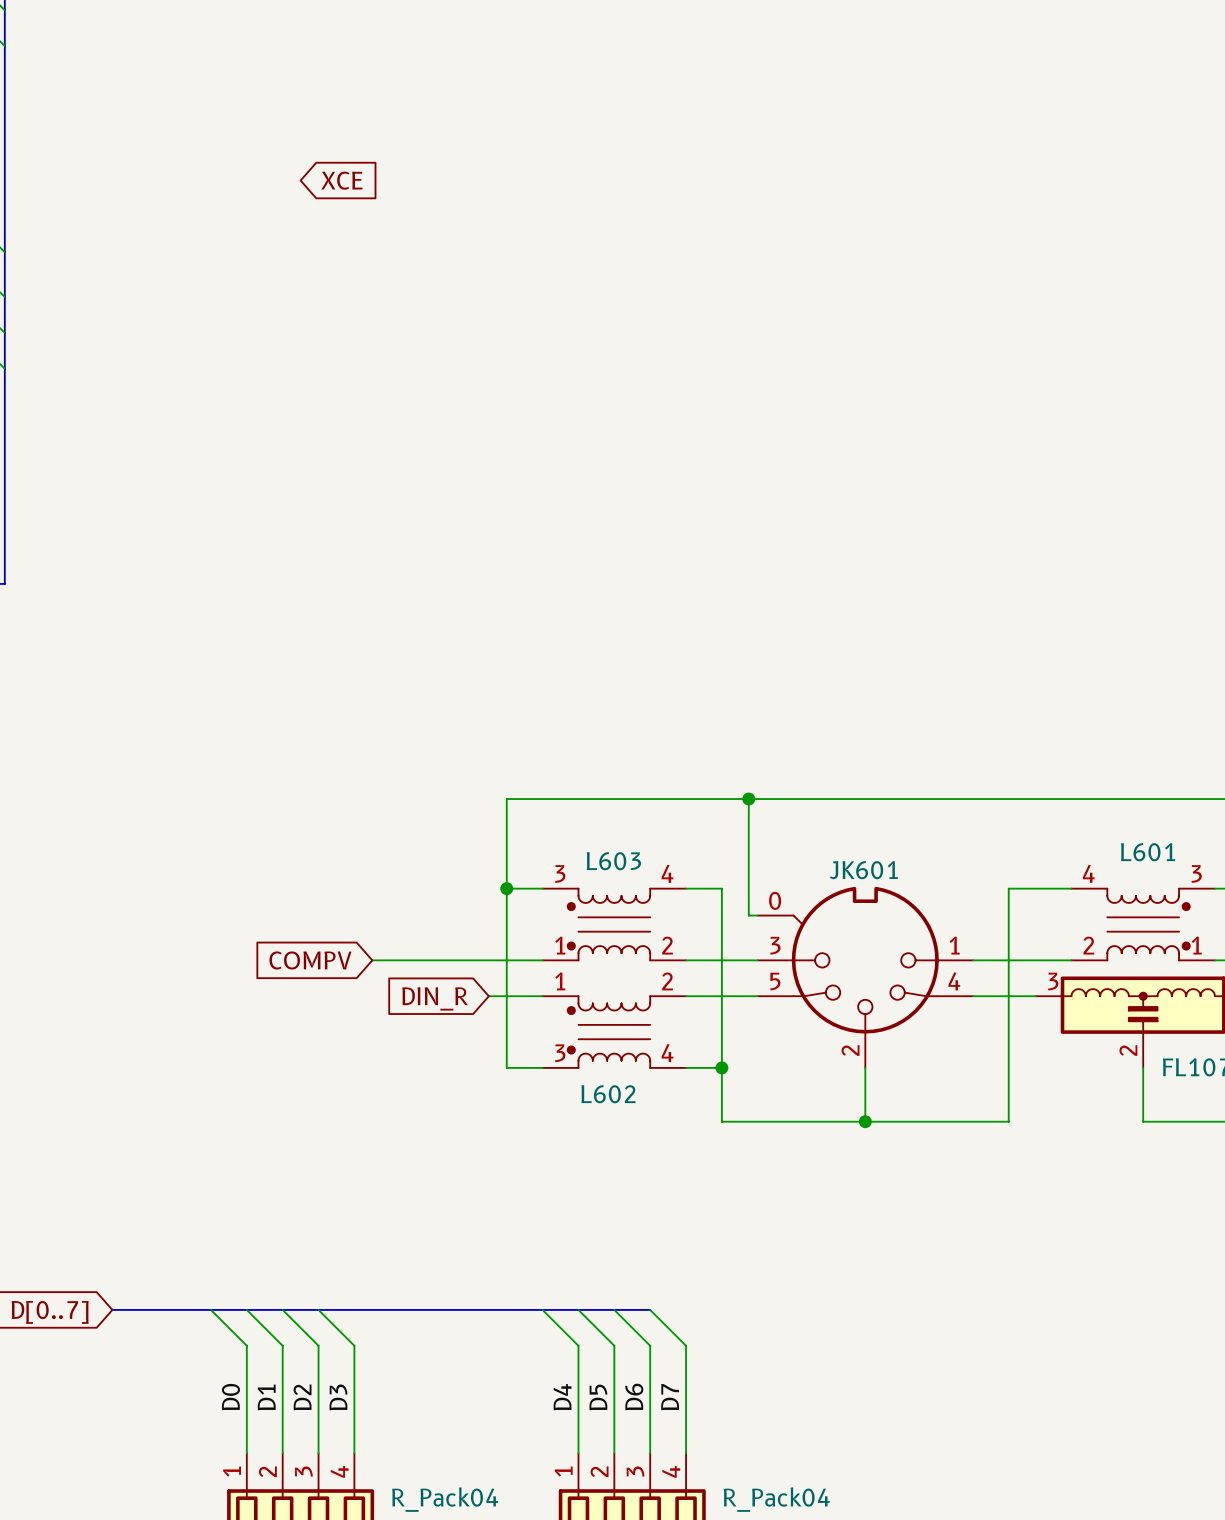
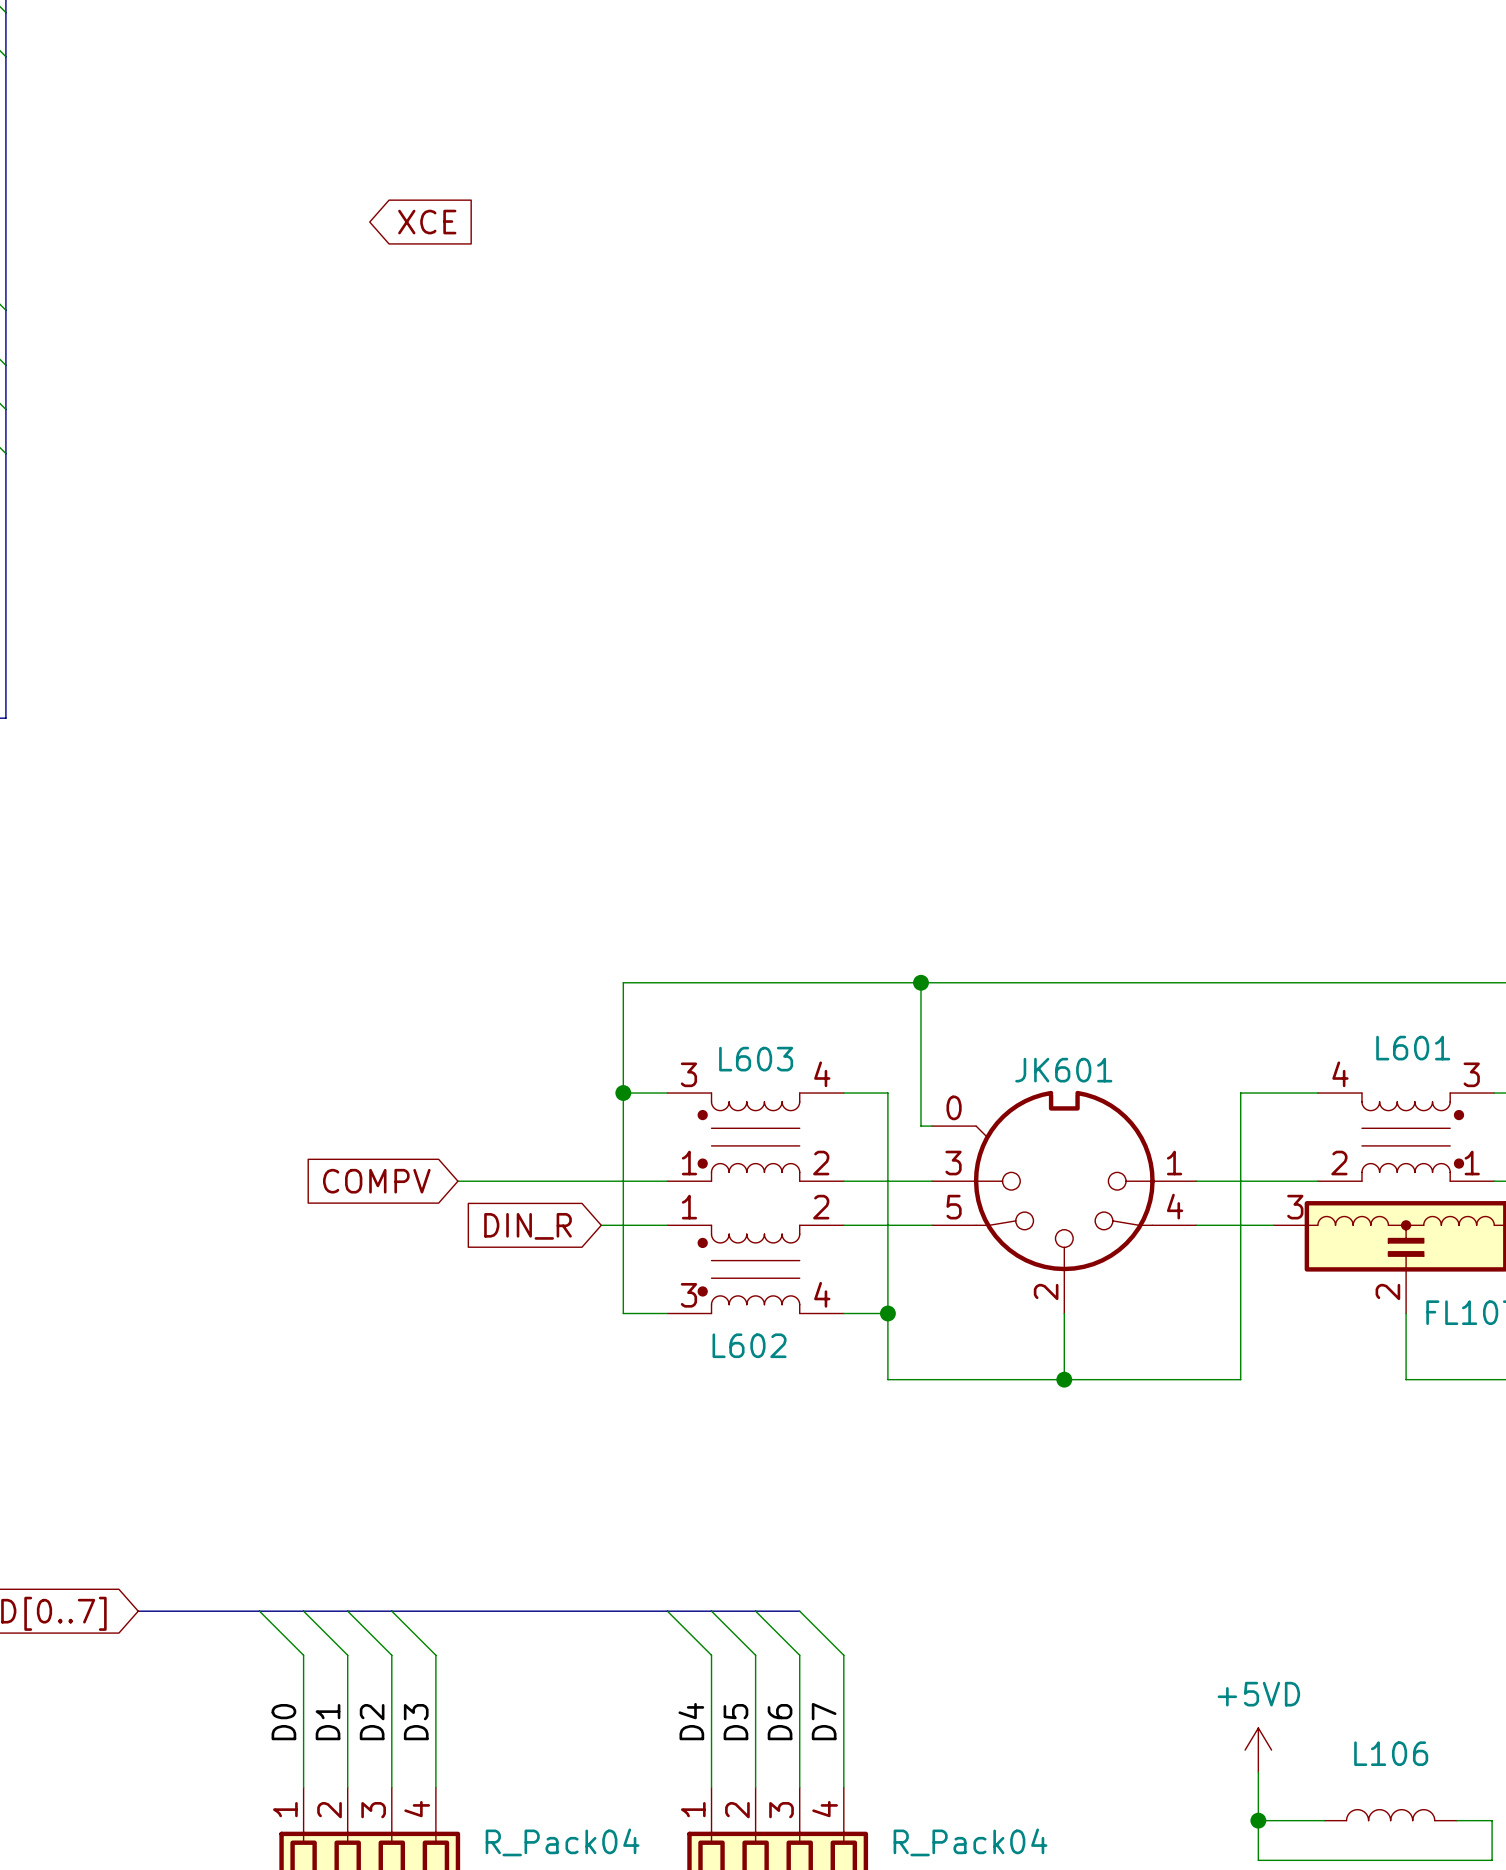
power symbol: none -> +5VD (1258, 1750)
wire: none -> (1258, 1772) (1258, 1860) (1492, 1860) (1492, 1820) (1456, 1820)
L106: none -> (1390, 1815)
wire: none -> (1258, 1820) (1324, 1820)
junction: none -> (1258, 1820)

